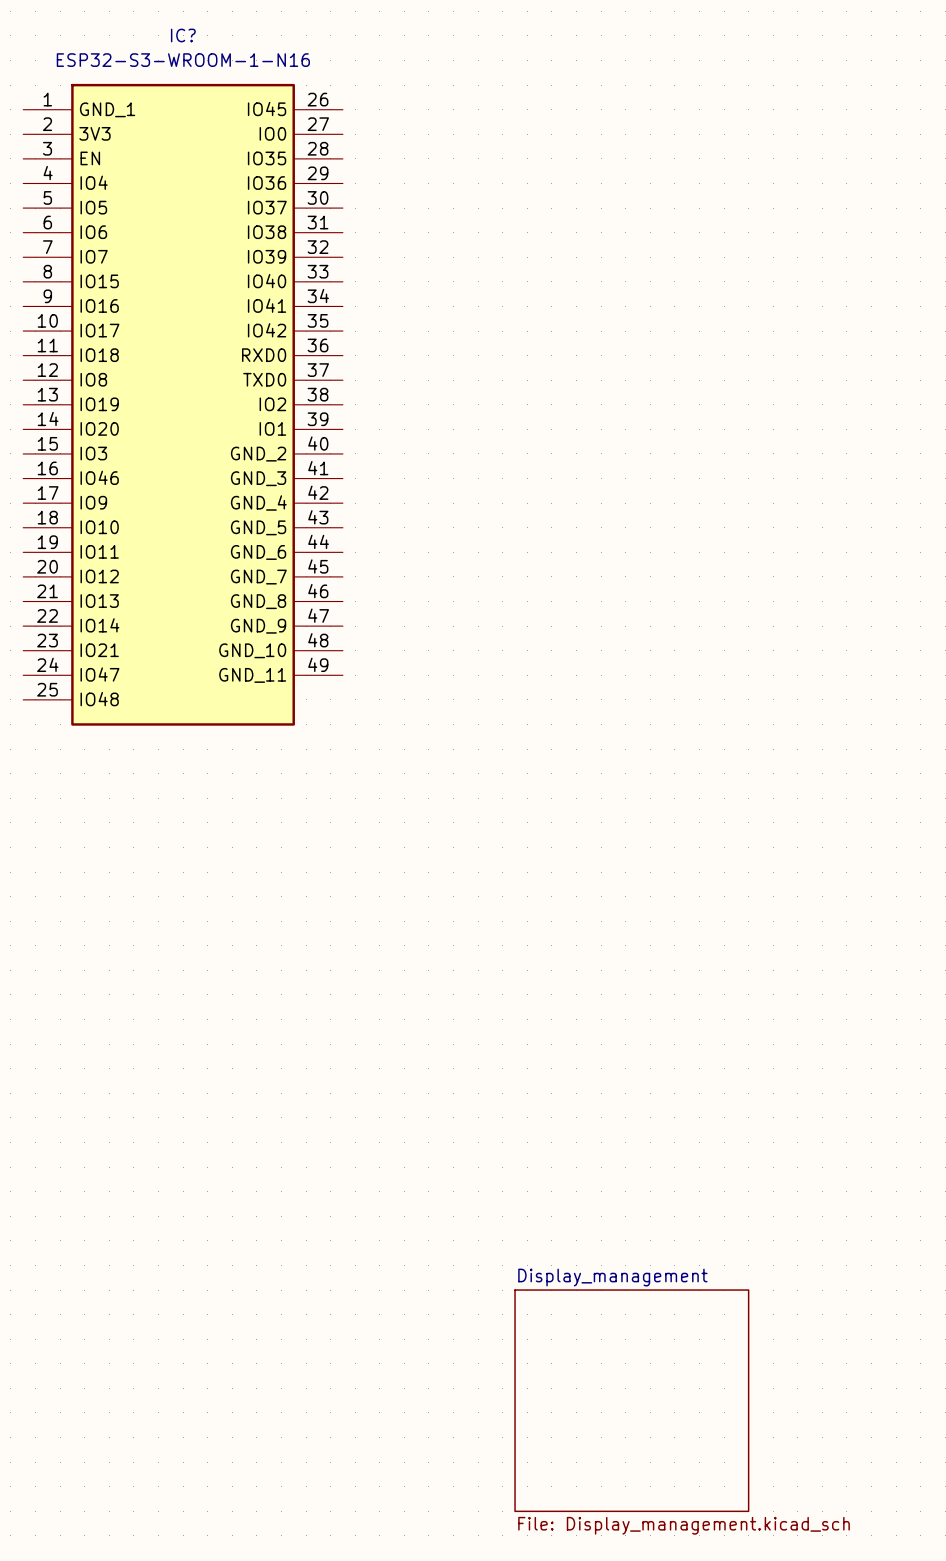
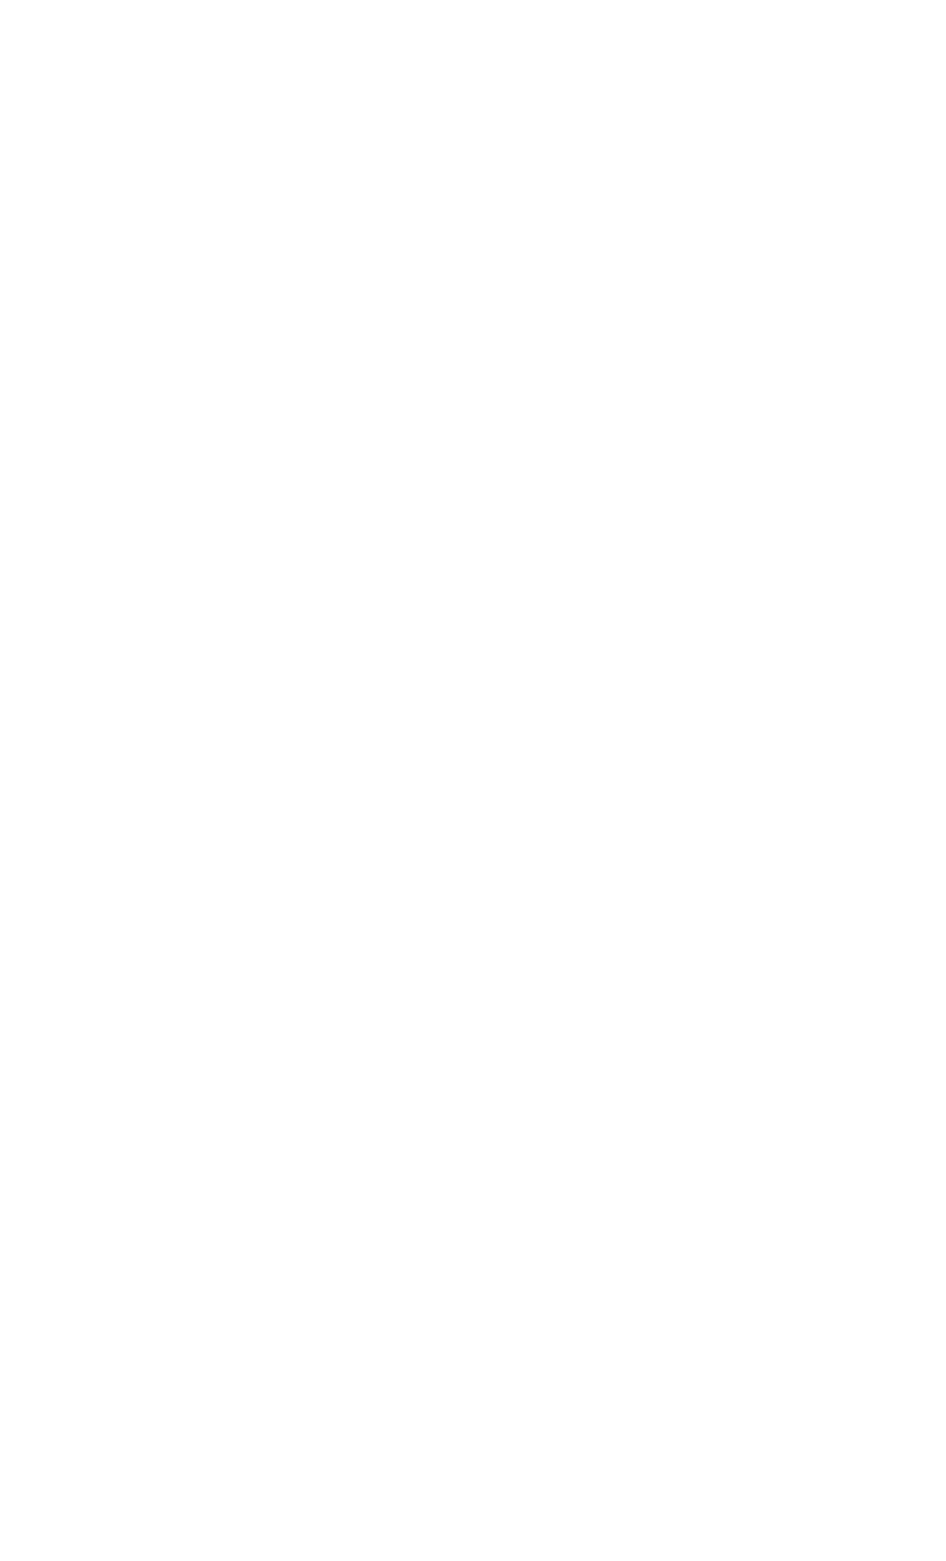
IC?: ESP32-S3-WROOM-1-N16 (183, 404) -> none
sheet Display_management: File: Display_management.kicad_sch (631, 1400) -> none

